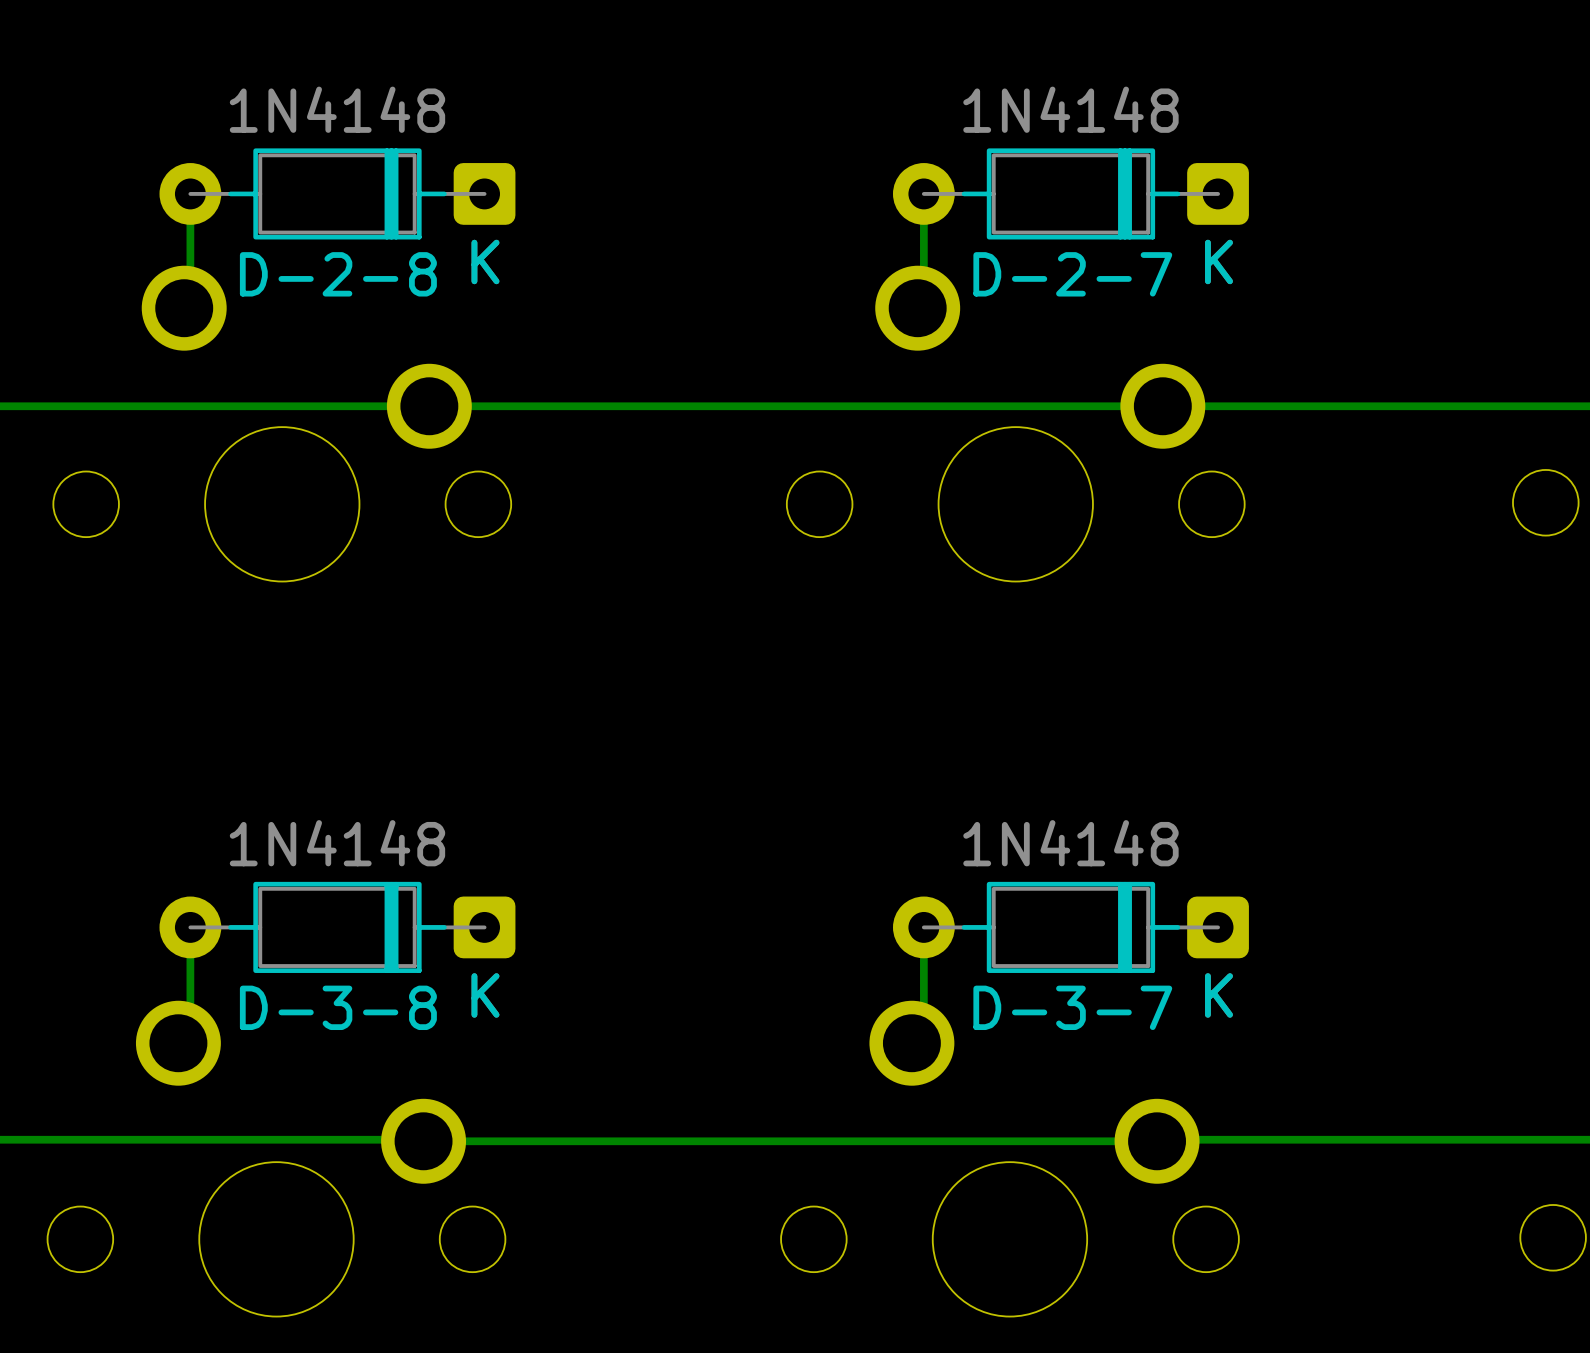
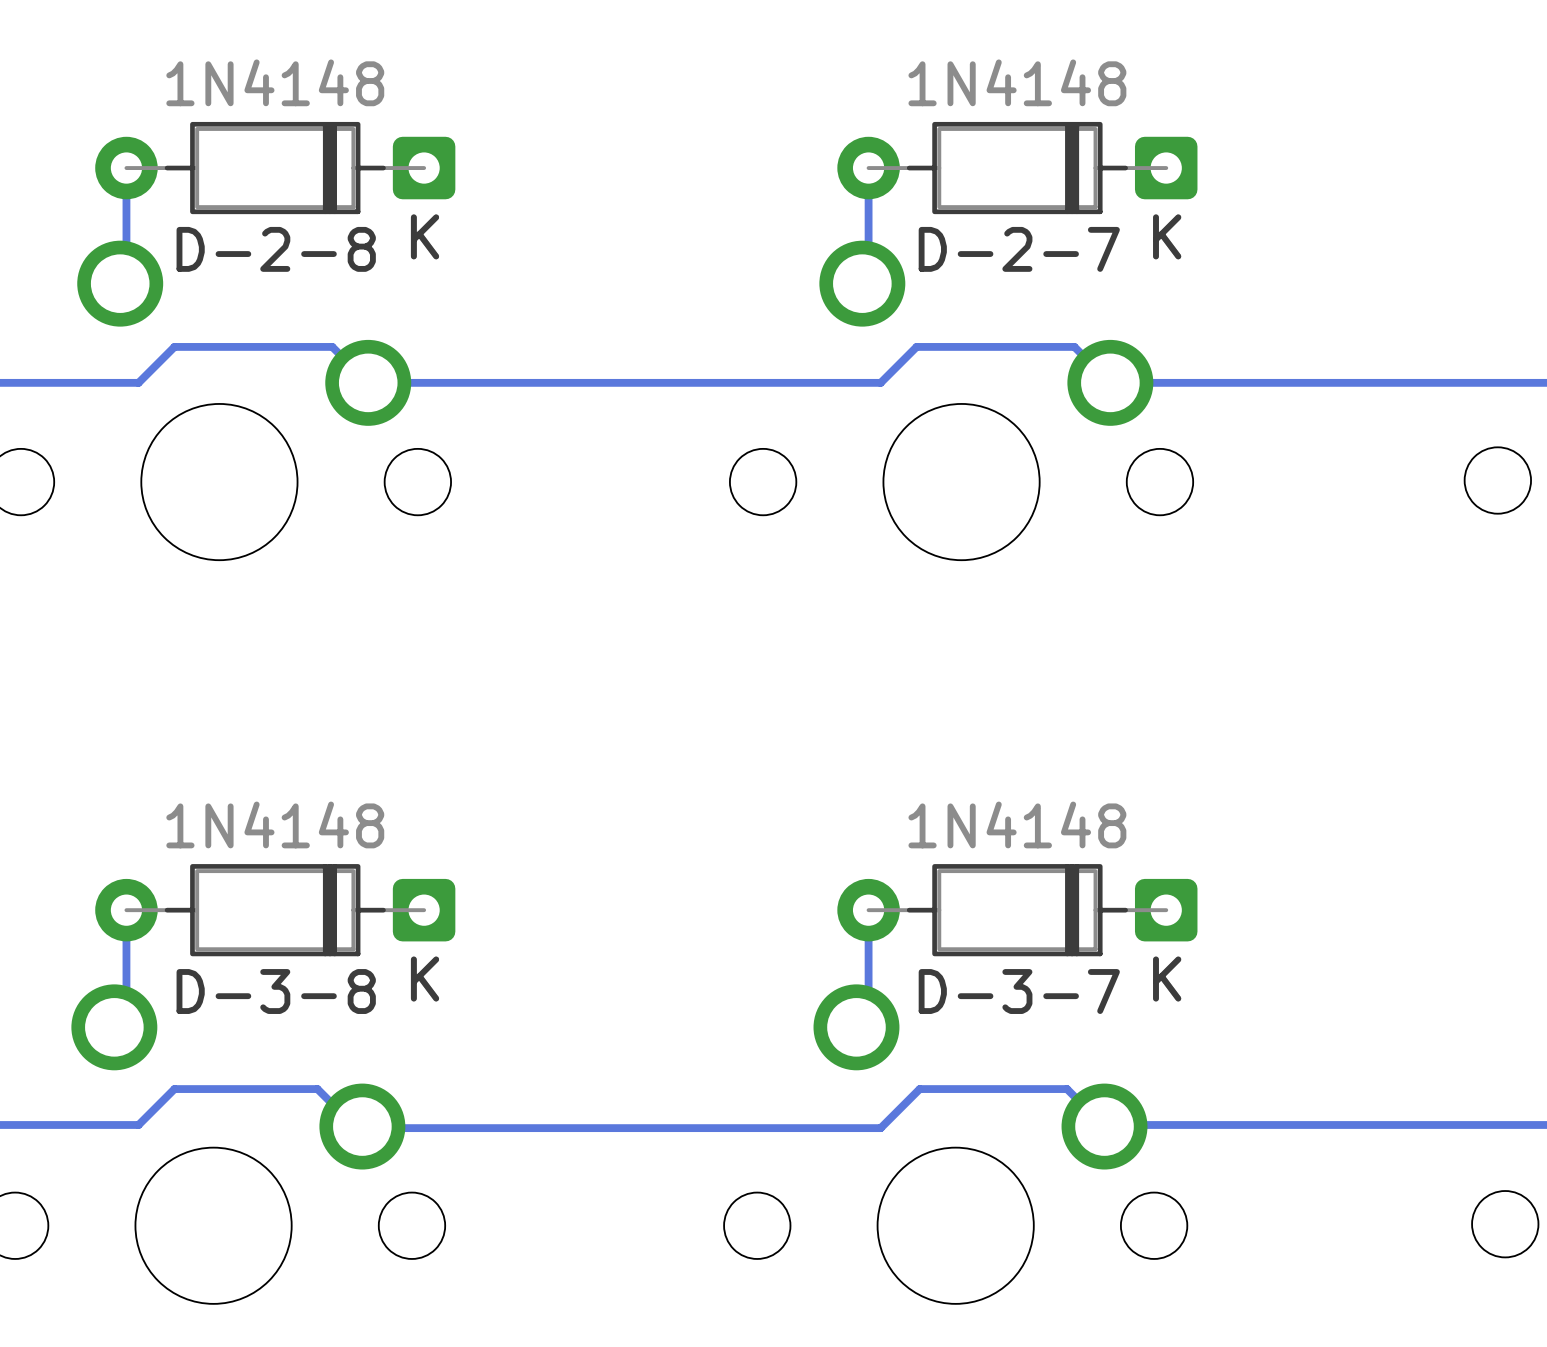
track: (429, 406) (202, 406) -> (368, 382) (332, 346) (174, 346) (138, 382)
track: (1162, 406) (935, 406) -> (1110, 382) (1074, 346) (916, 346) (880, 382)
track: (414, 1139) (202, 1139) -> (353, 1124) (317, 1089) (174, 1089) (138, 1124)
track: (1157, 1141) (423, 1141) -> (1104, 1126) (1067, 1089) (919, 1089) (880, 1128) (363, 1128) (362, 1126)

